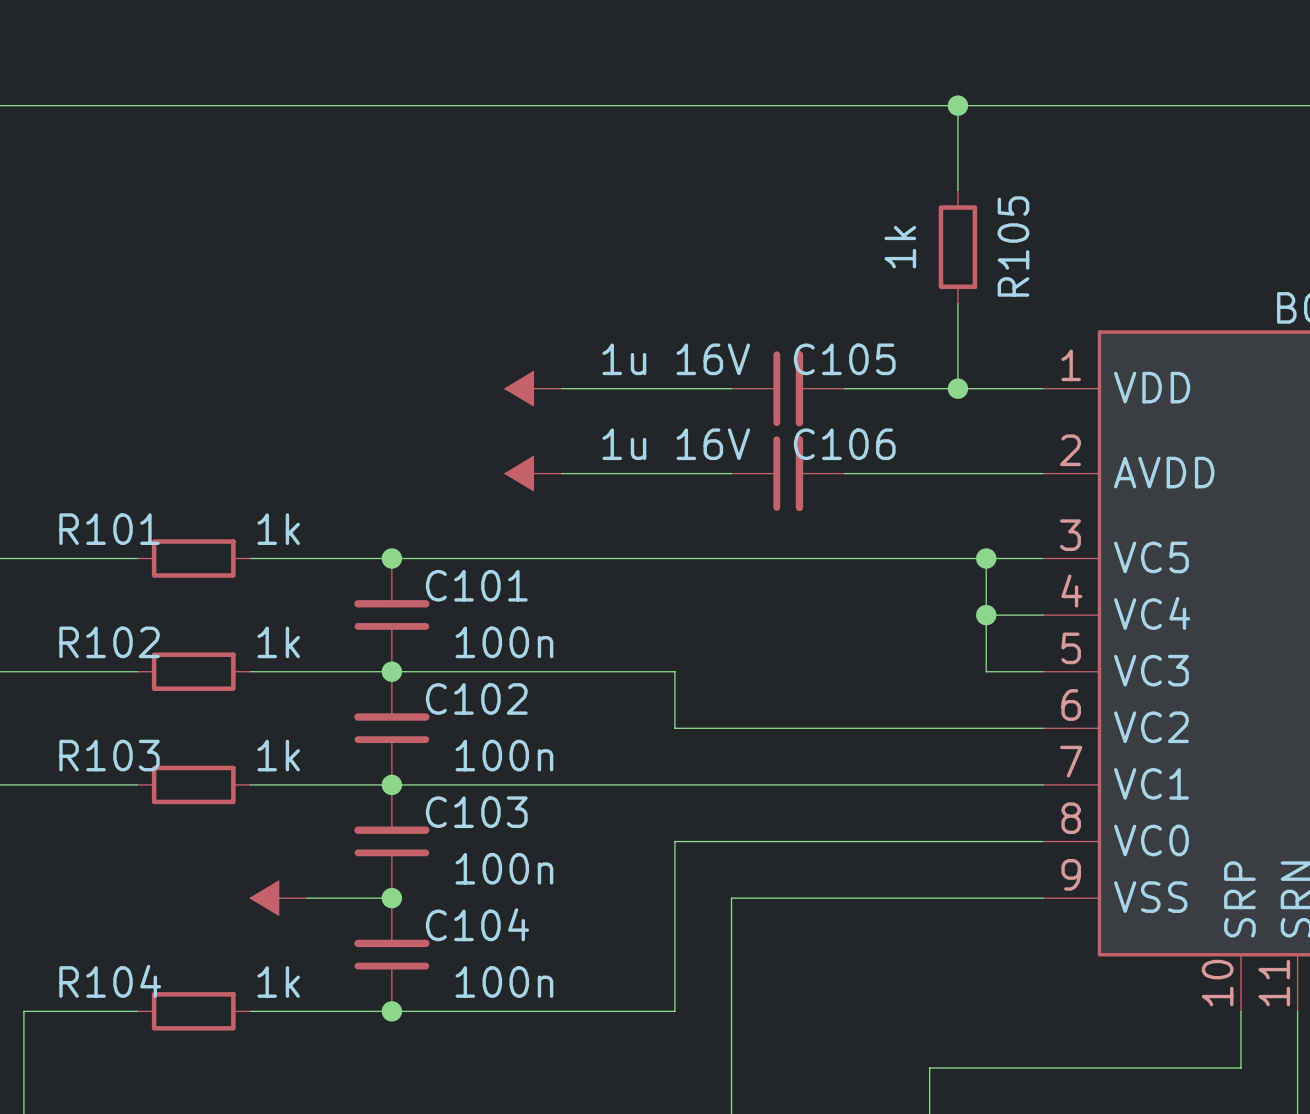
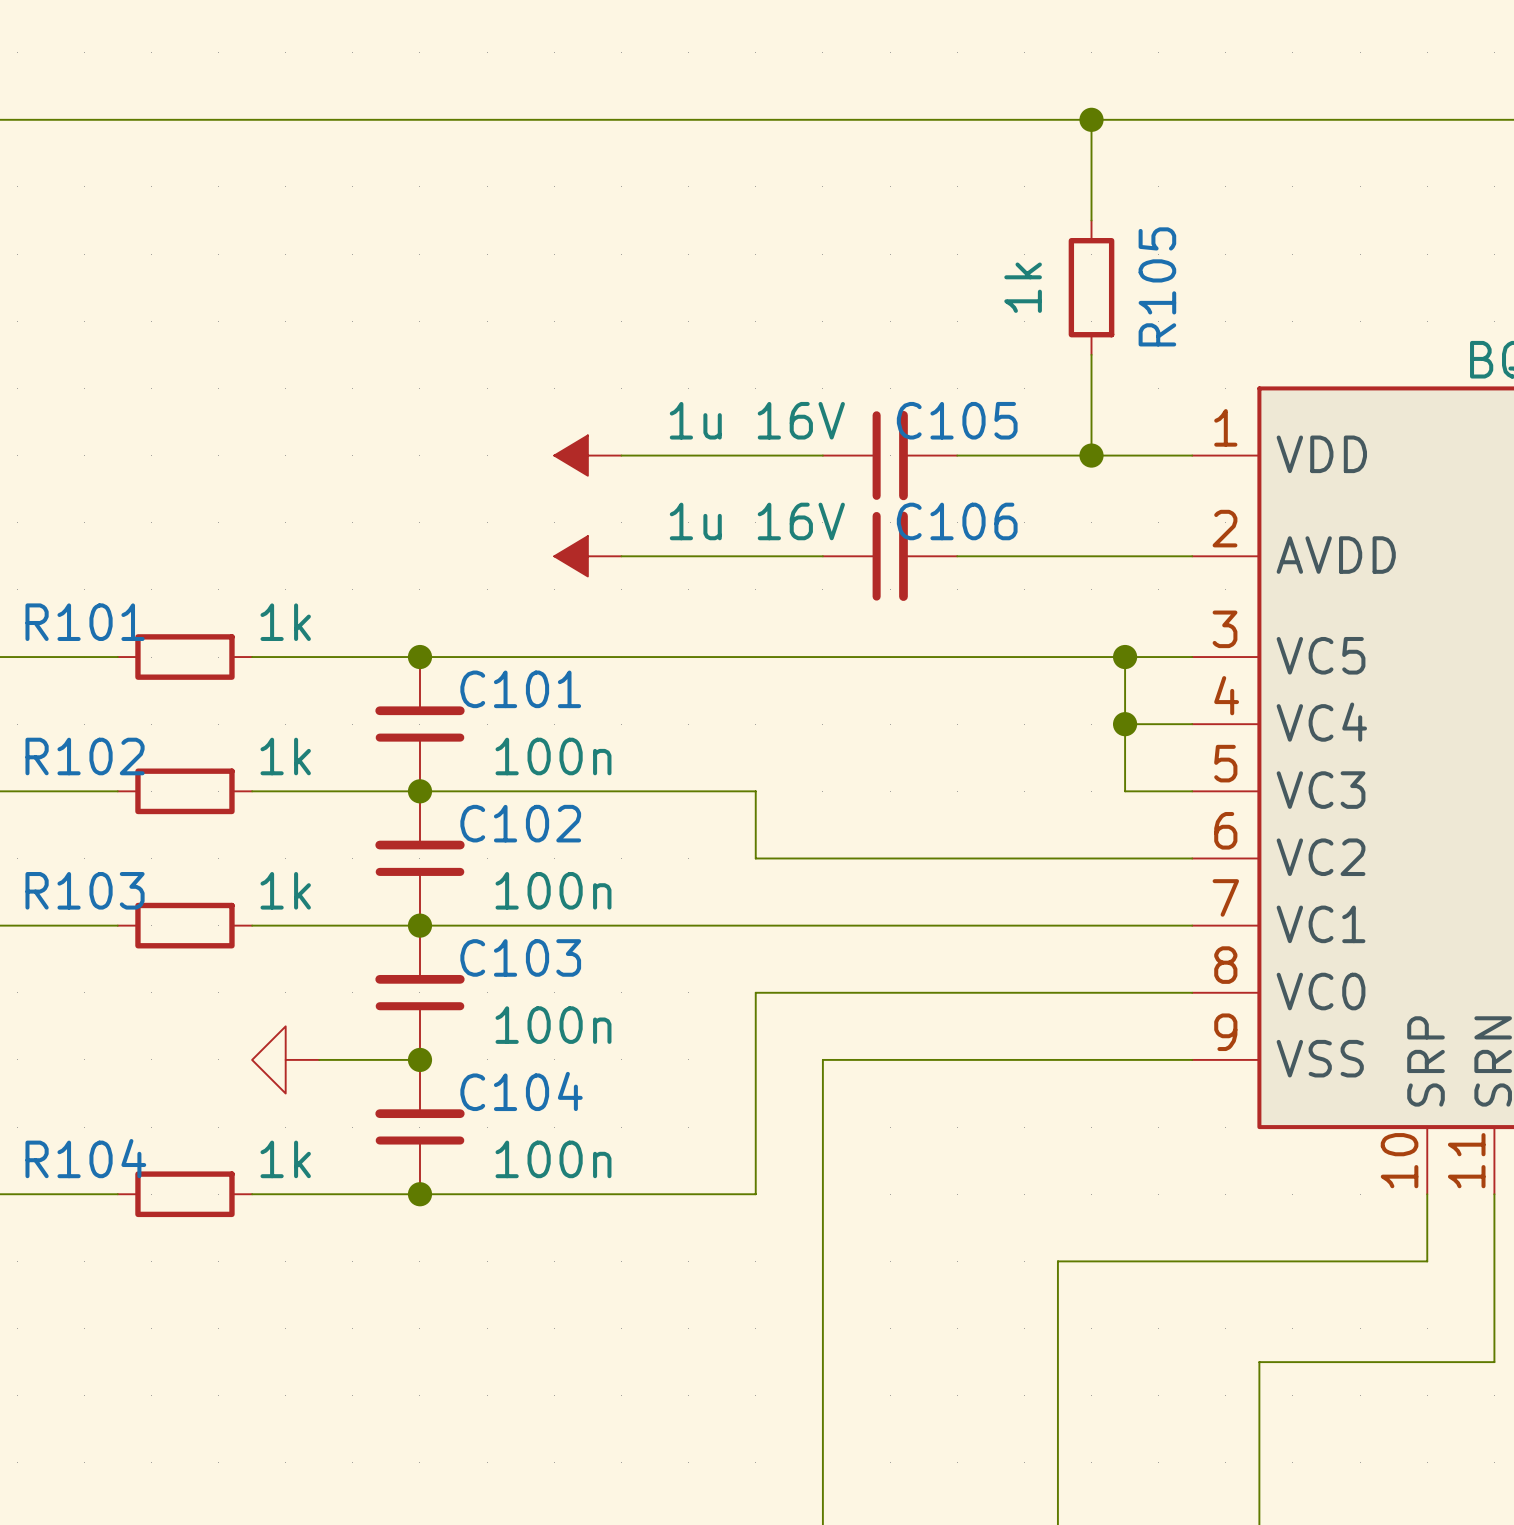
power symbol shape: [250, 881, 307, 916] -> [252, 1026, 320, 1094]

